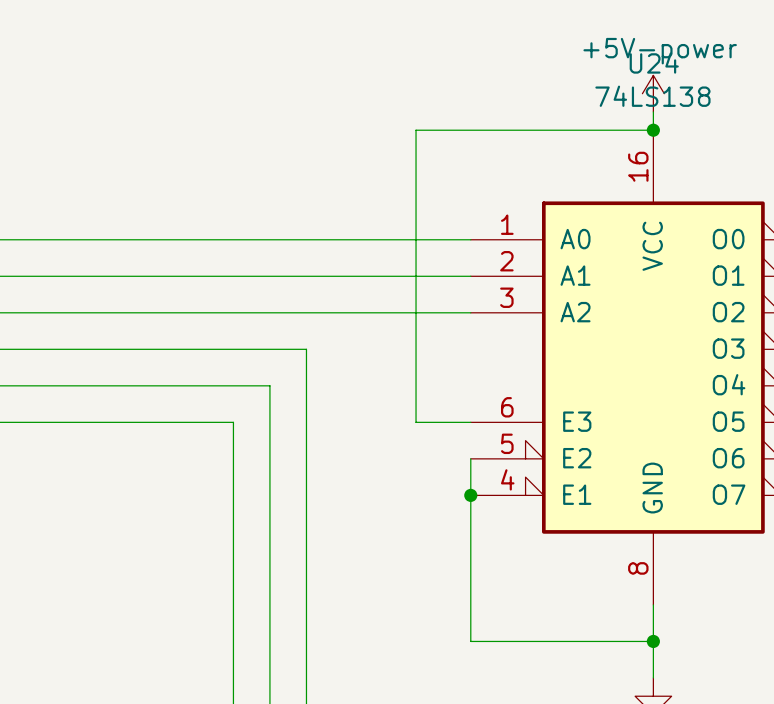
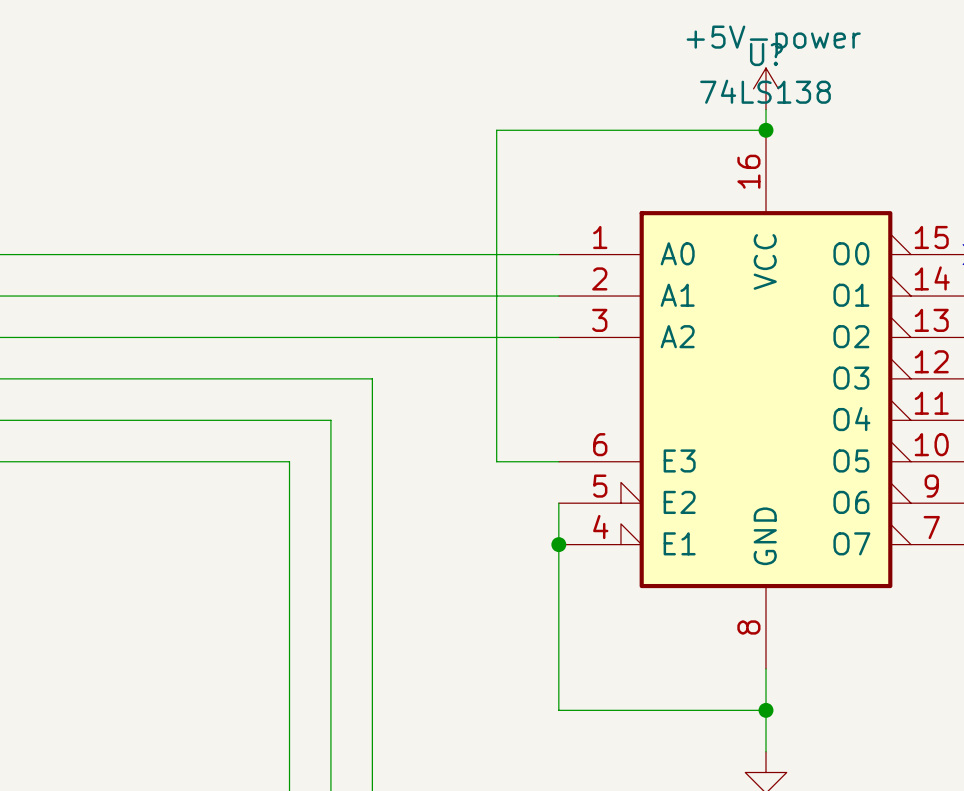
U24 name: U24 (654, 63) -> U? (766, 54)

